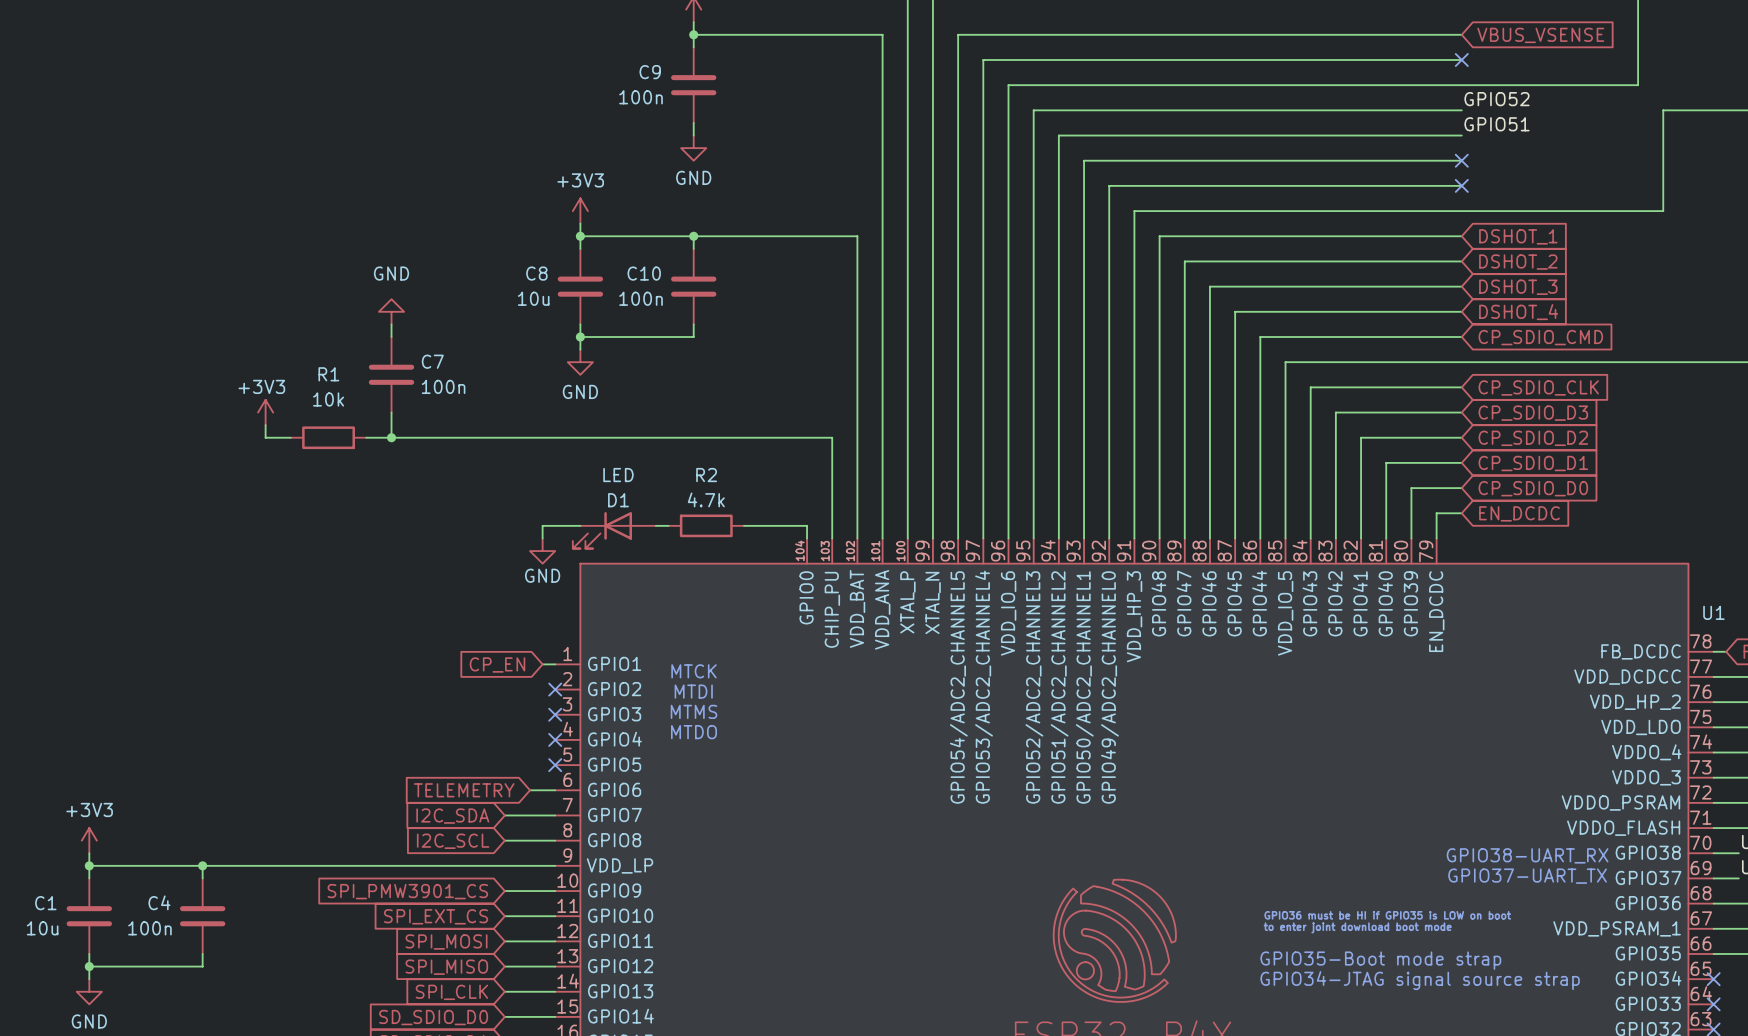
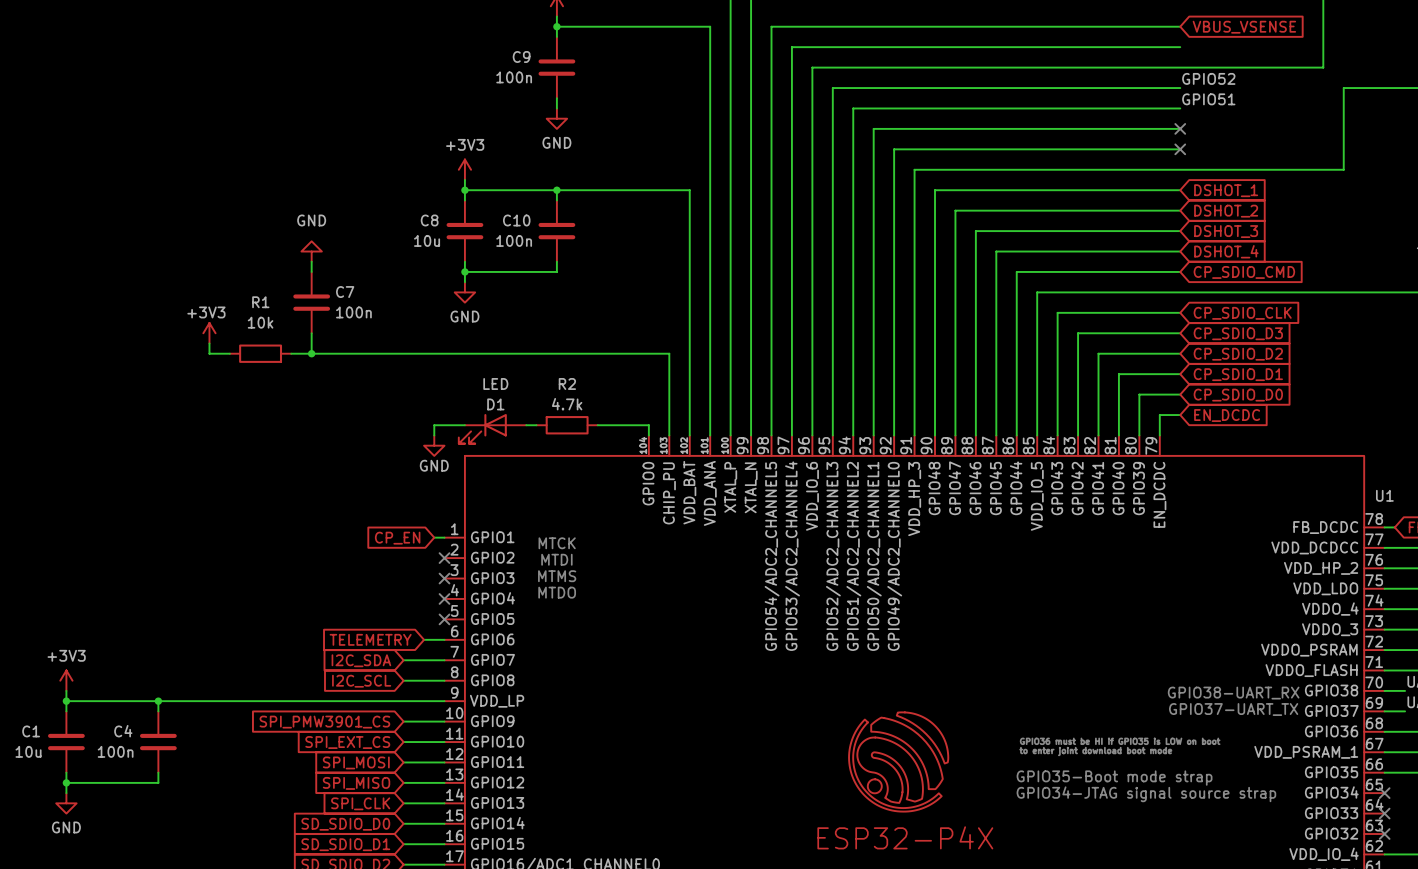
no-connect mark: (1461, 59) -> none

